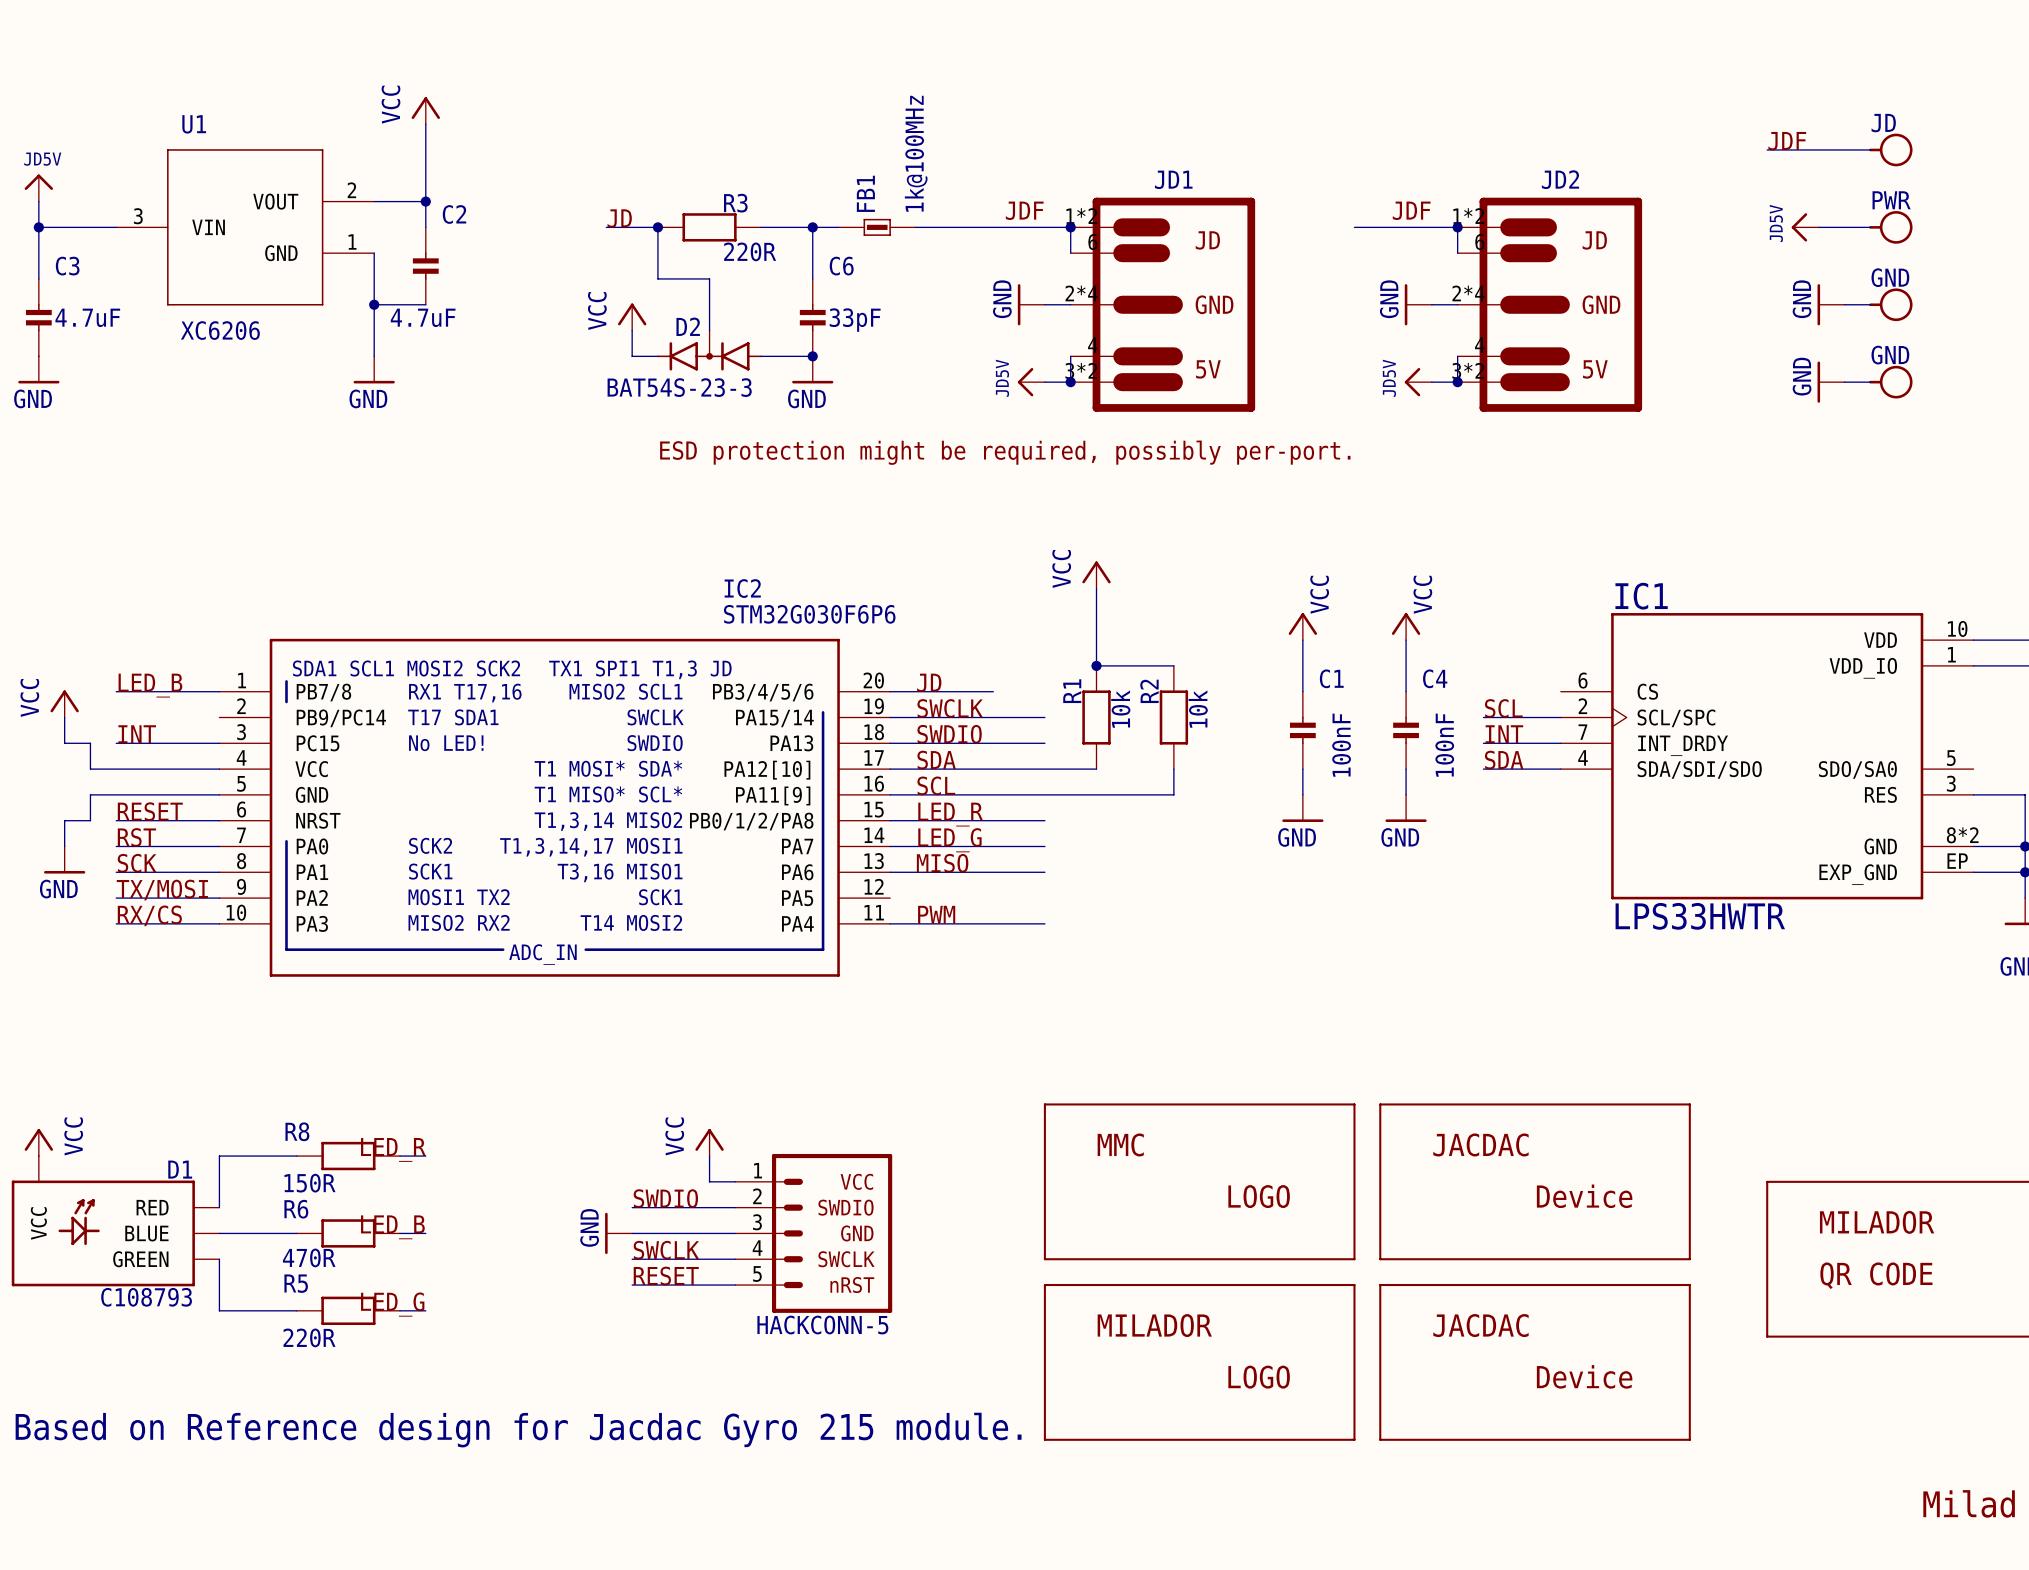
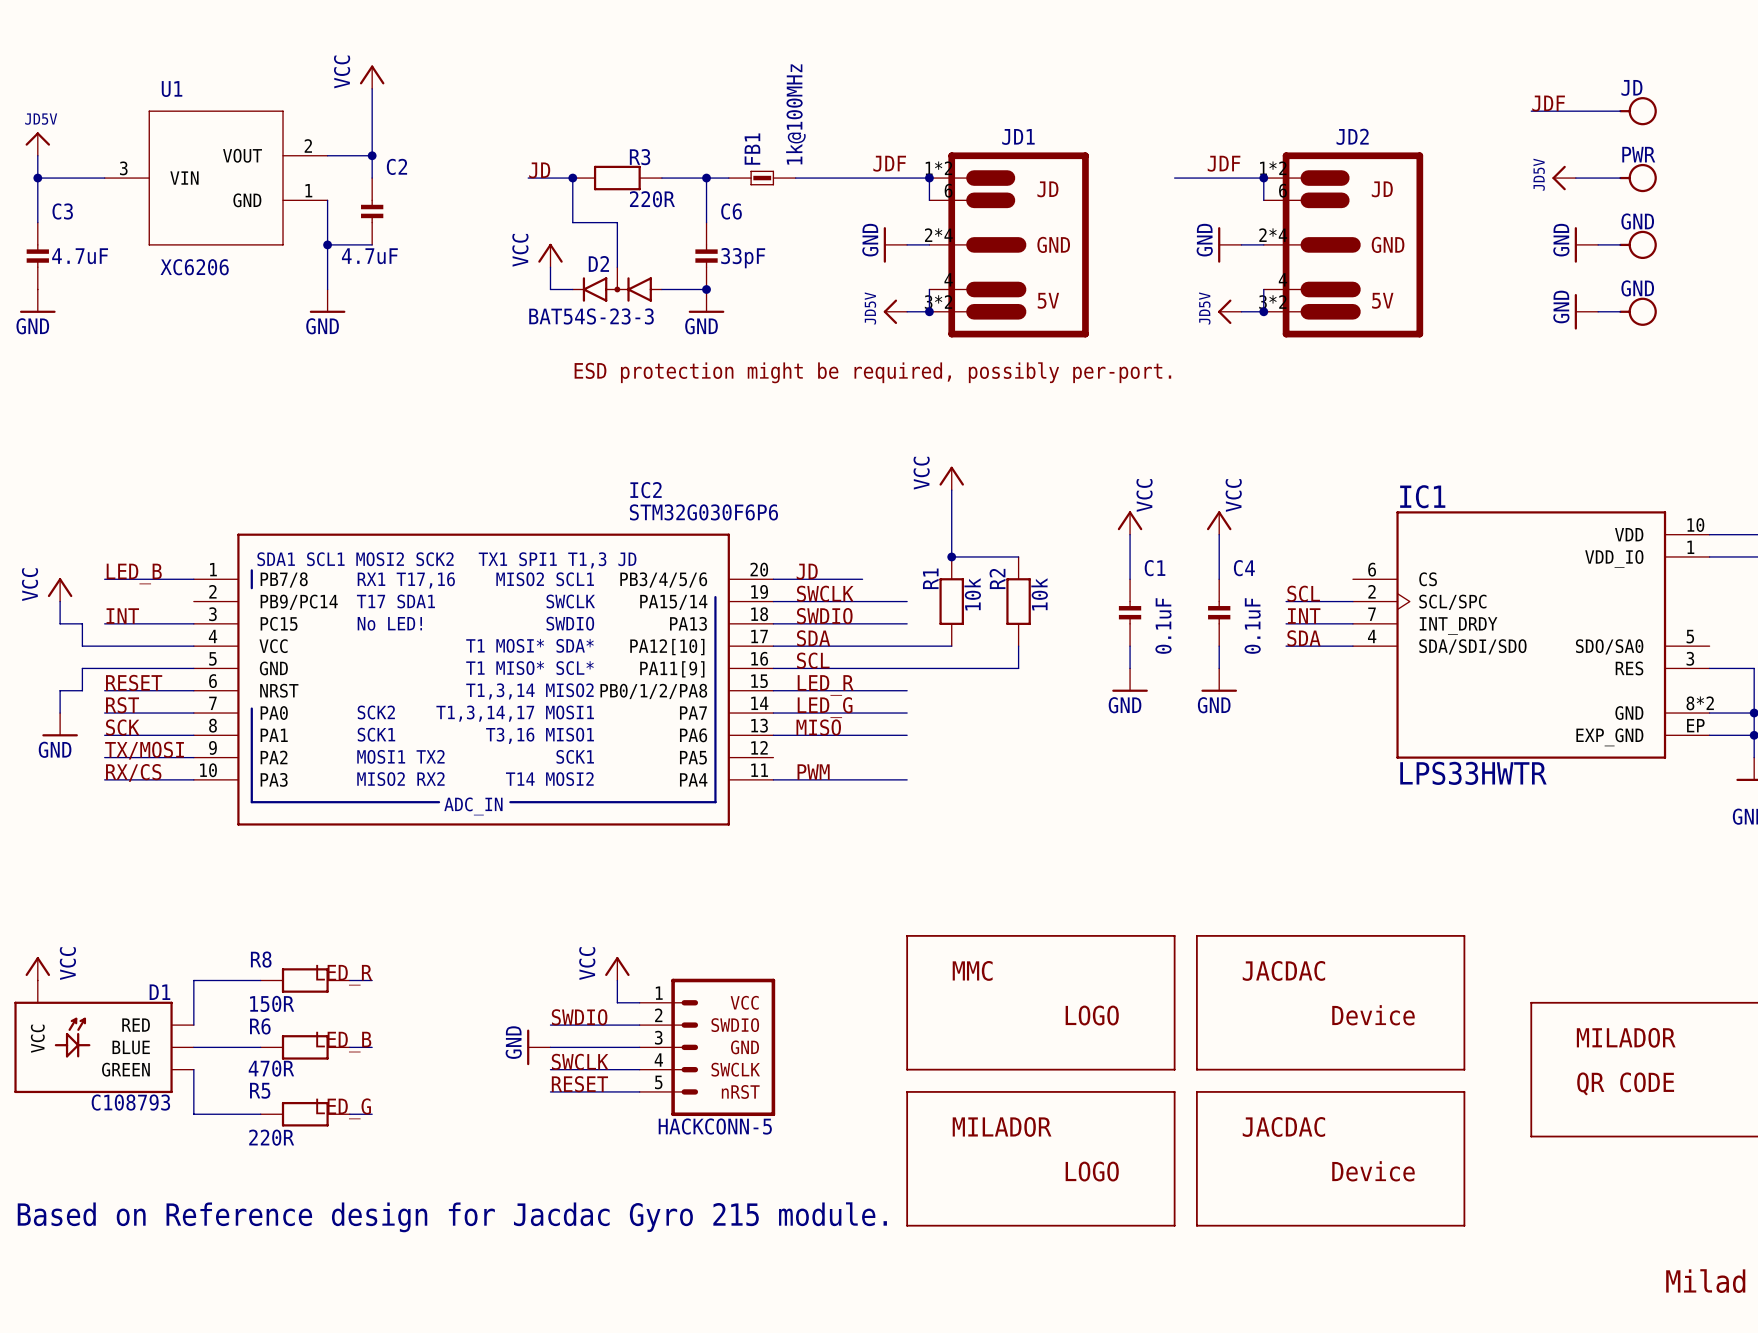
C1 value: 100nF (1341, 745) -> 0.1uF (1163, 626)
C4 value: 100nF (1444, 745) -> 0.1uF (1252, 626)

